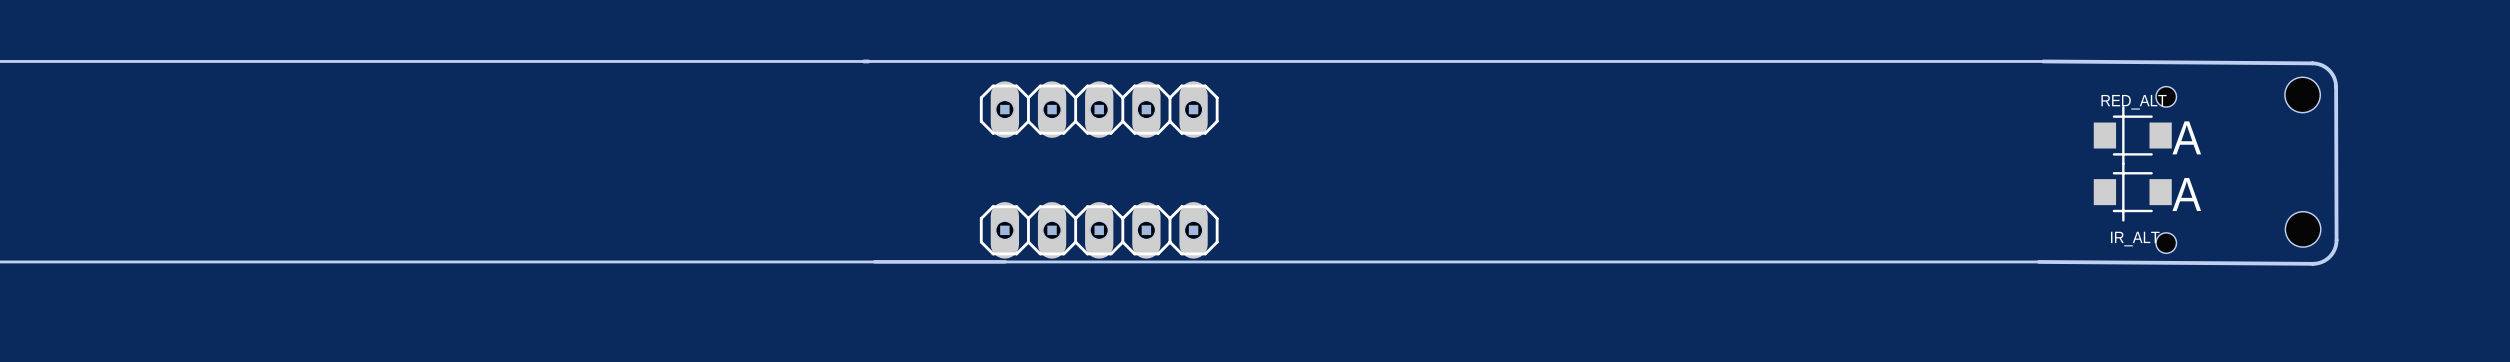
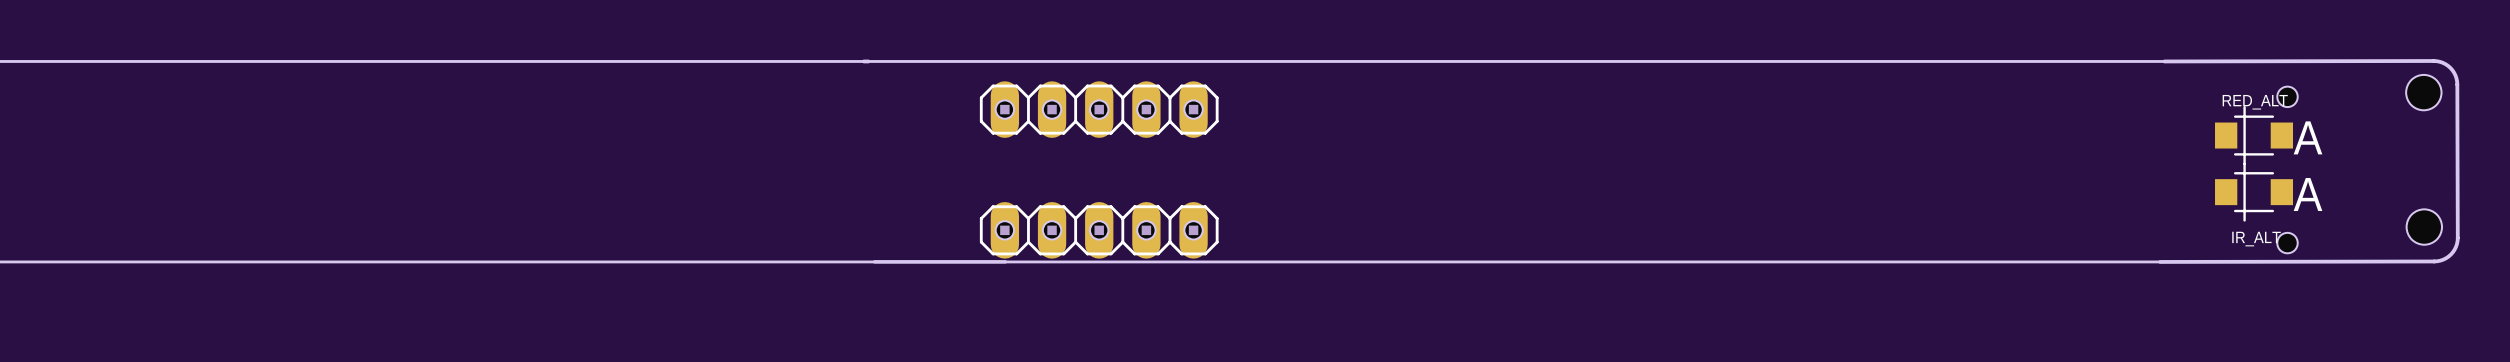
board edge: (2043, 61) (2312, 63) (2324, 66) (2332, 75) (2335, 83) (2336, 240) (2331, 254) (2324, 260) (2316, 263) (2038, 261) -> (2043, 61) (2433, 60) (2442, 62) (2452, 70) (2457, 81) (2457, 237) (2456, 246) (2450, 254) (2443, 259) (2434, 261) (2038, 261)
hole size: [2284, 77, 2321, 113] -> [2277, 86, 2298, 108]
hole: none -> (2423, 92)
hole: (2166, 96) -> none
text position: RED_ALT (2134, 102) -> RED_ALT (2255, 102)
part: (2132, 135) -> none
part: none -> (2254, 135)
part: (2132, 192) -> none
part: none -> (2254, 192)
hole: none -> (2424, 227)
hole: (2303, 229) -> none
text position: IR_ALT (2135, 239) -> IR_ALT (2256, 239)
hole: (2166, 243) -> none
hole: none -> (2287, 243)

